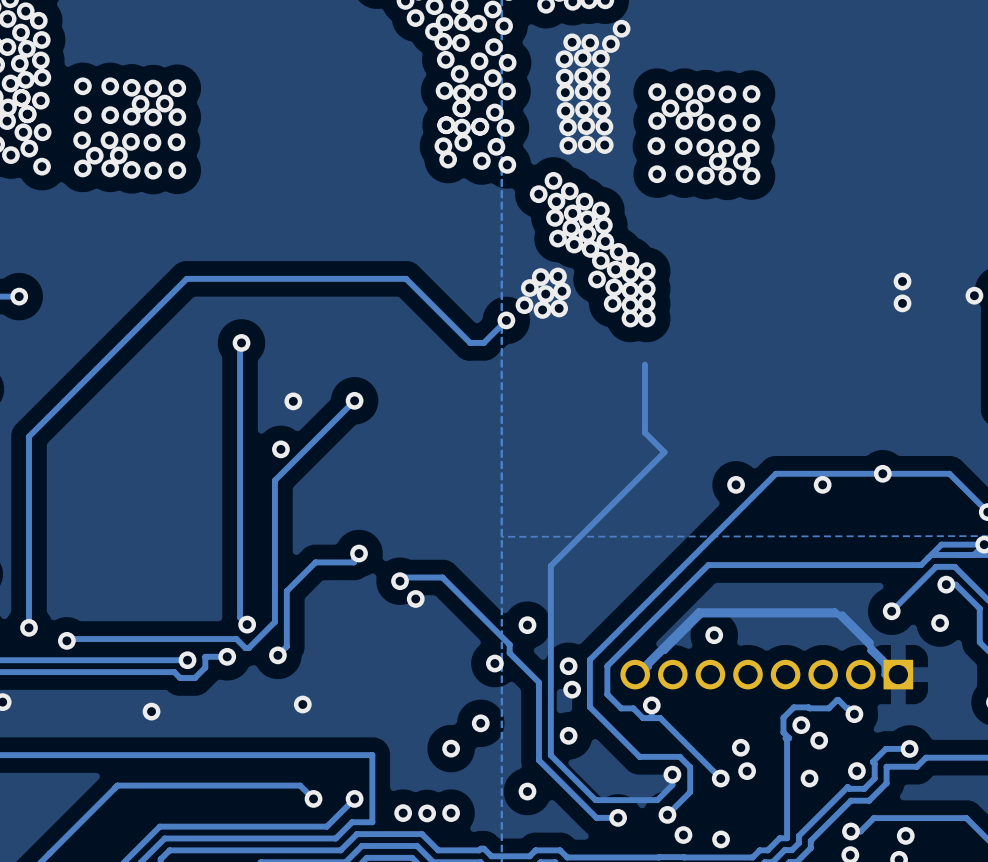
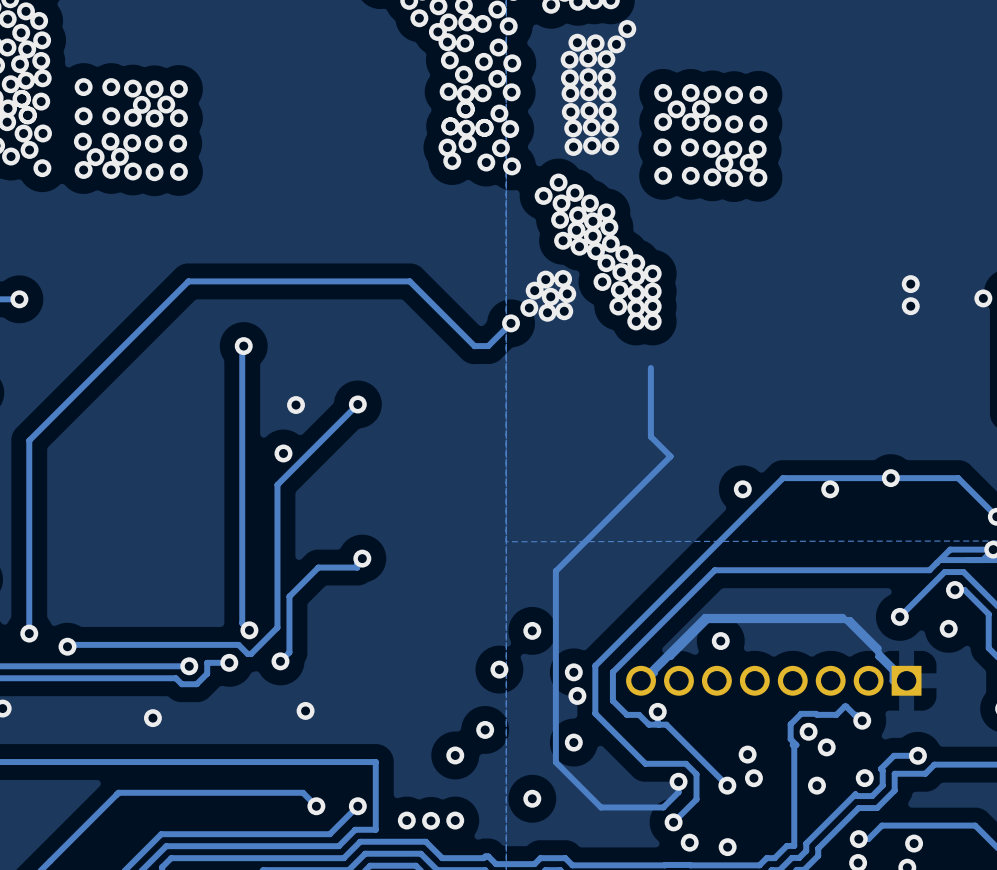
track: (400, 581) (403, 577) (442, 577) (509, 644) (509, 653) (538, 682) (538, 760) (596, 817) (618, 817) -> none
via: (400, 581) -> none
via: (415, 598) -> none
via: (618, 817) -> none

